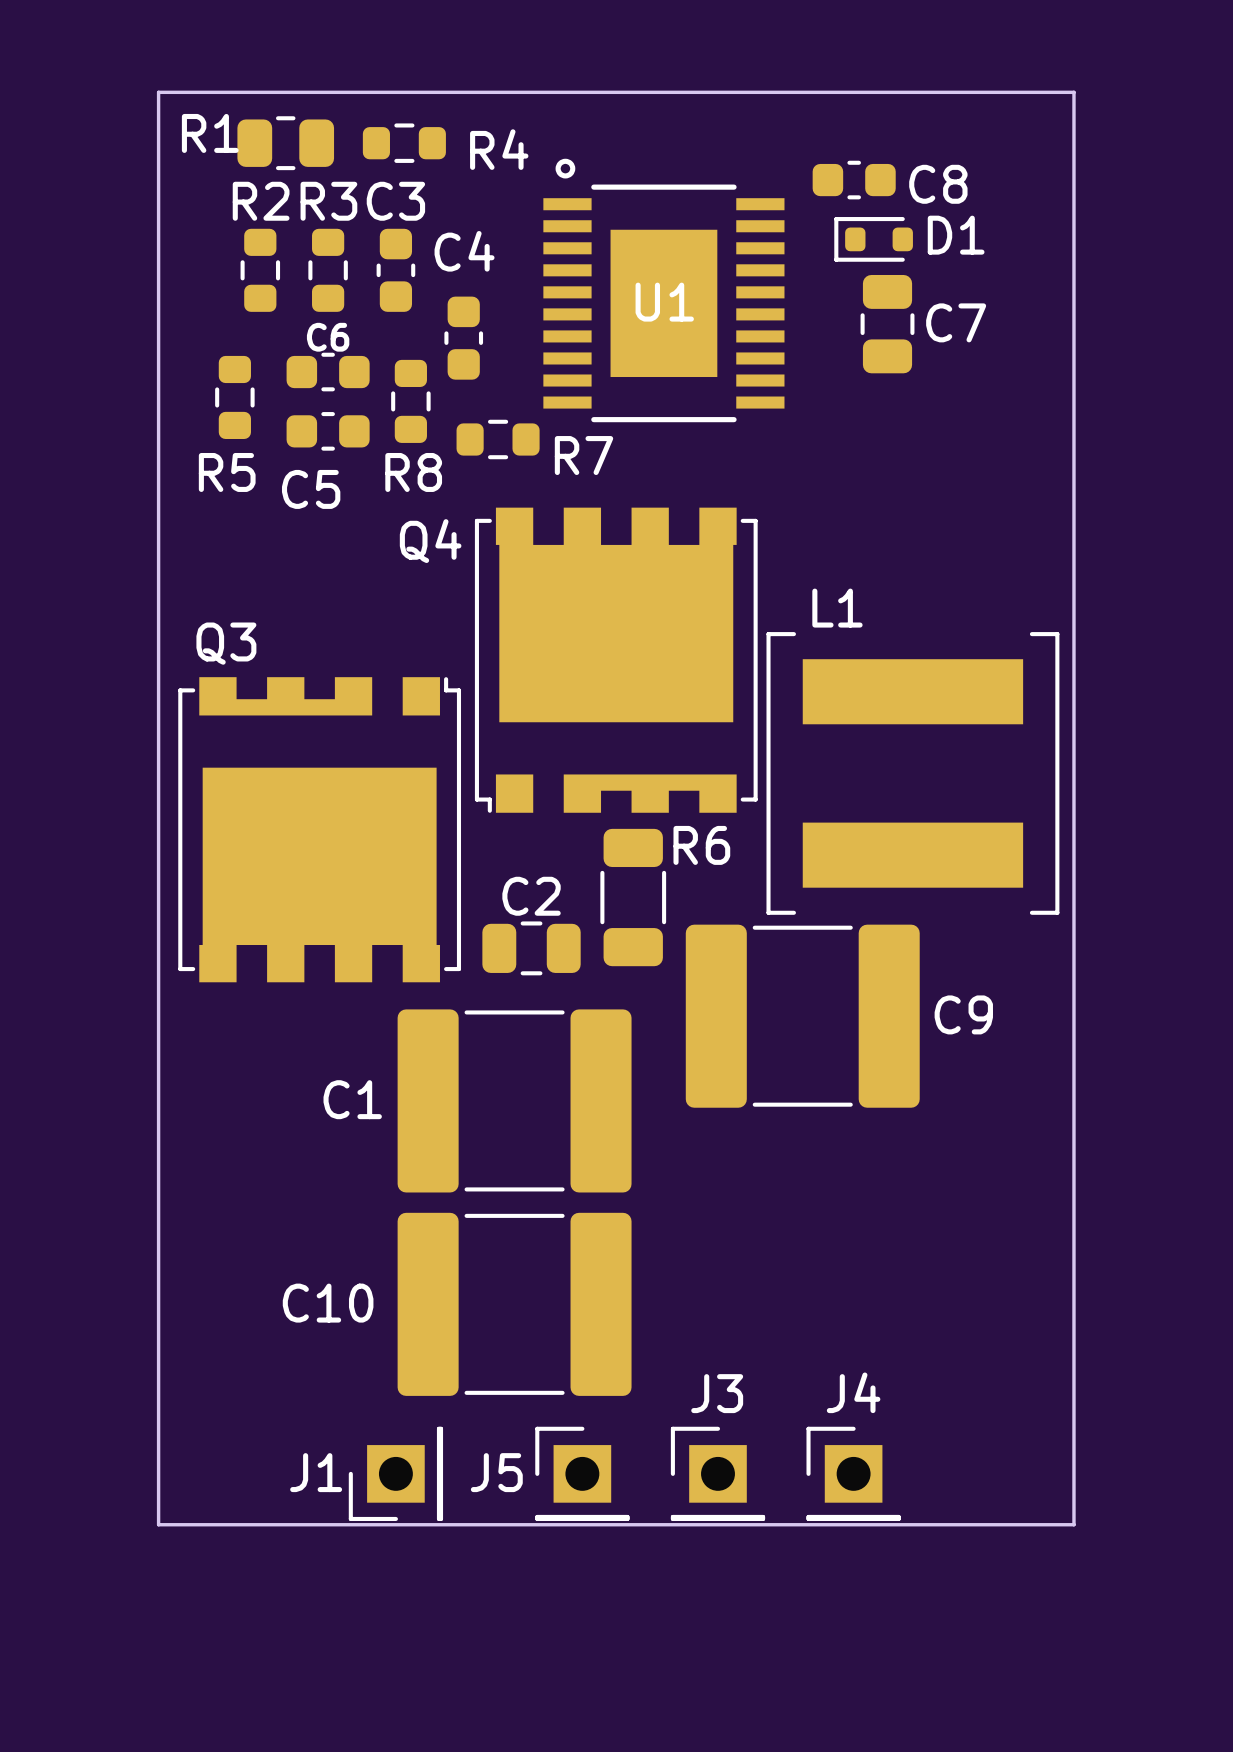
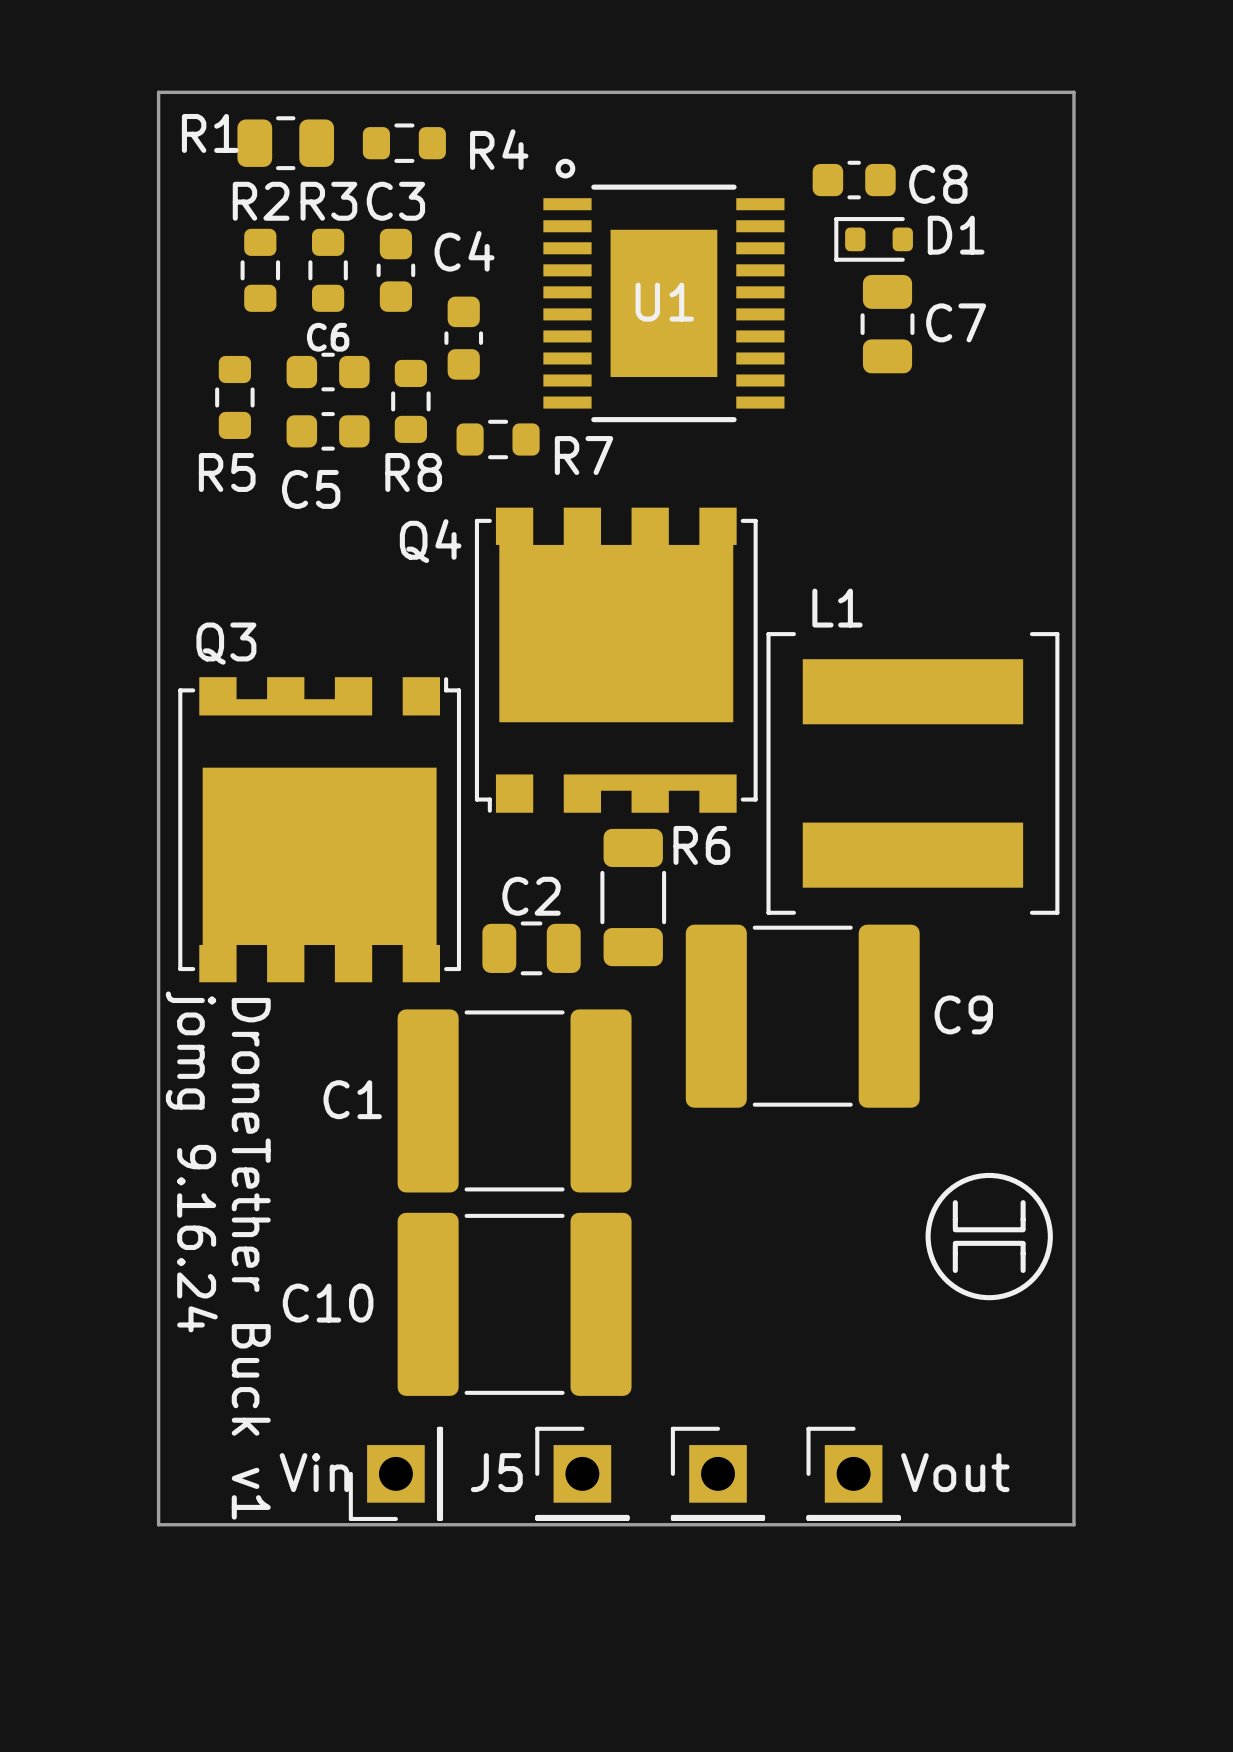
text: none -> jomg 9.16.24 (191, 1161)
drawing: none -> [925, 1172, 1053, 1301]
line: none -> (955, 1202) (955, 1228)
line: none -> (1023, 1202) (1023, 1228)
line: none -> (955, 1229) (1023, 1229)
line: none -> (955, 1243) (1023, 1243)
line: none -> (955, 1245) (955, 1270)
line: none -> (1023, 1245) (1023, 1270)
text: none -> DroneTether Buck v1 (251, 1258)
J4 name: J4 (853, 1392) -> Vout (955, 1472)
J3 name: J3 (717, 1393) -> none
J1 name: J1 (316, 1472) -> Vin (314, 1472)

